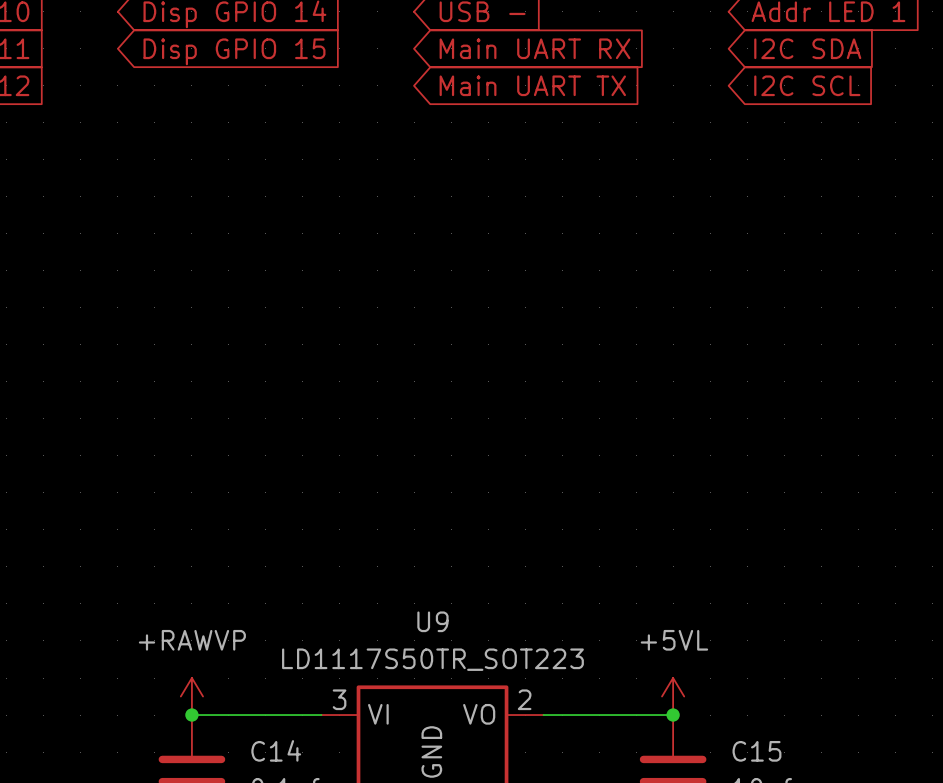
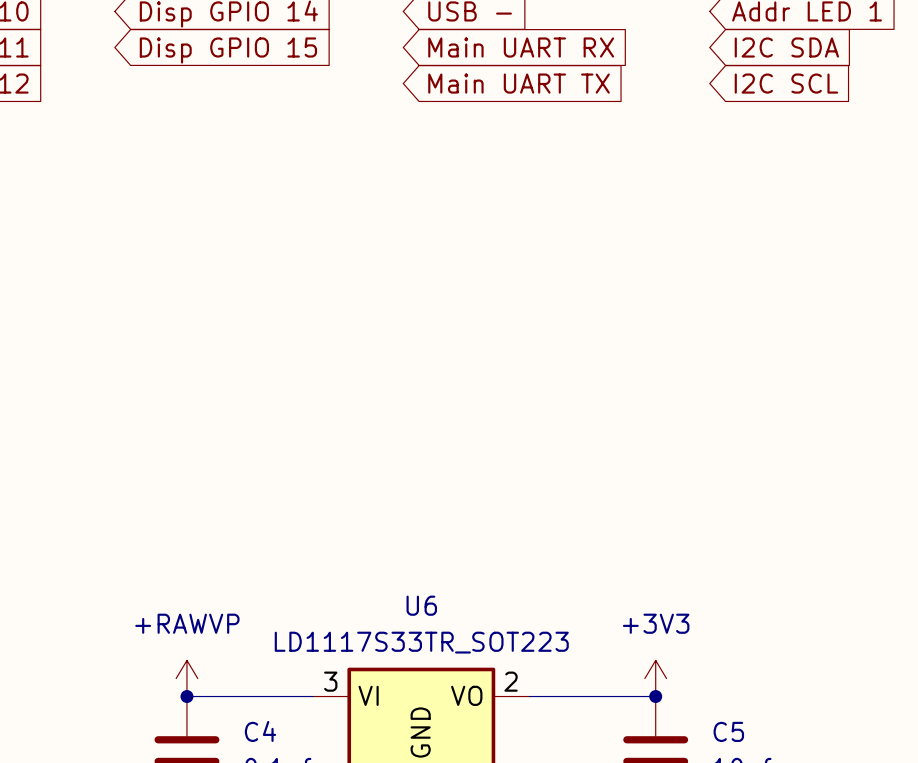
U9 name: U9 (432, 621) -> U6 (421, 605)
U9 value: LD1117S50TR_SOT223 (432, 659) -> LD1117S33TR_SOT223 (421, 642)
power symbol: +5VL (673, 696) -> +3V3 (655, 678)
C14 name: C14 (276, 750) -> C4 (260, 731)
C15 name: C15 (756, 751) -> C5 (728, 731)

